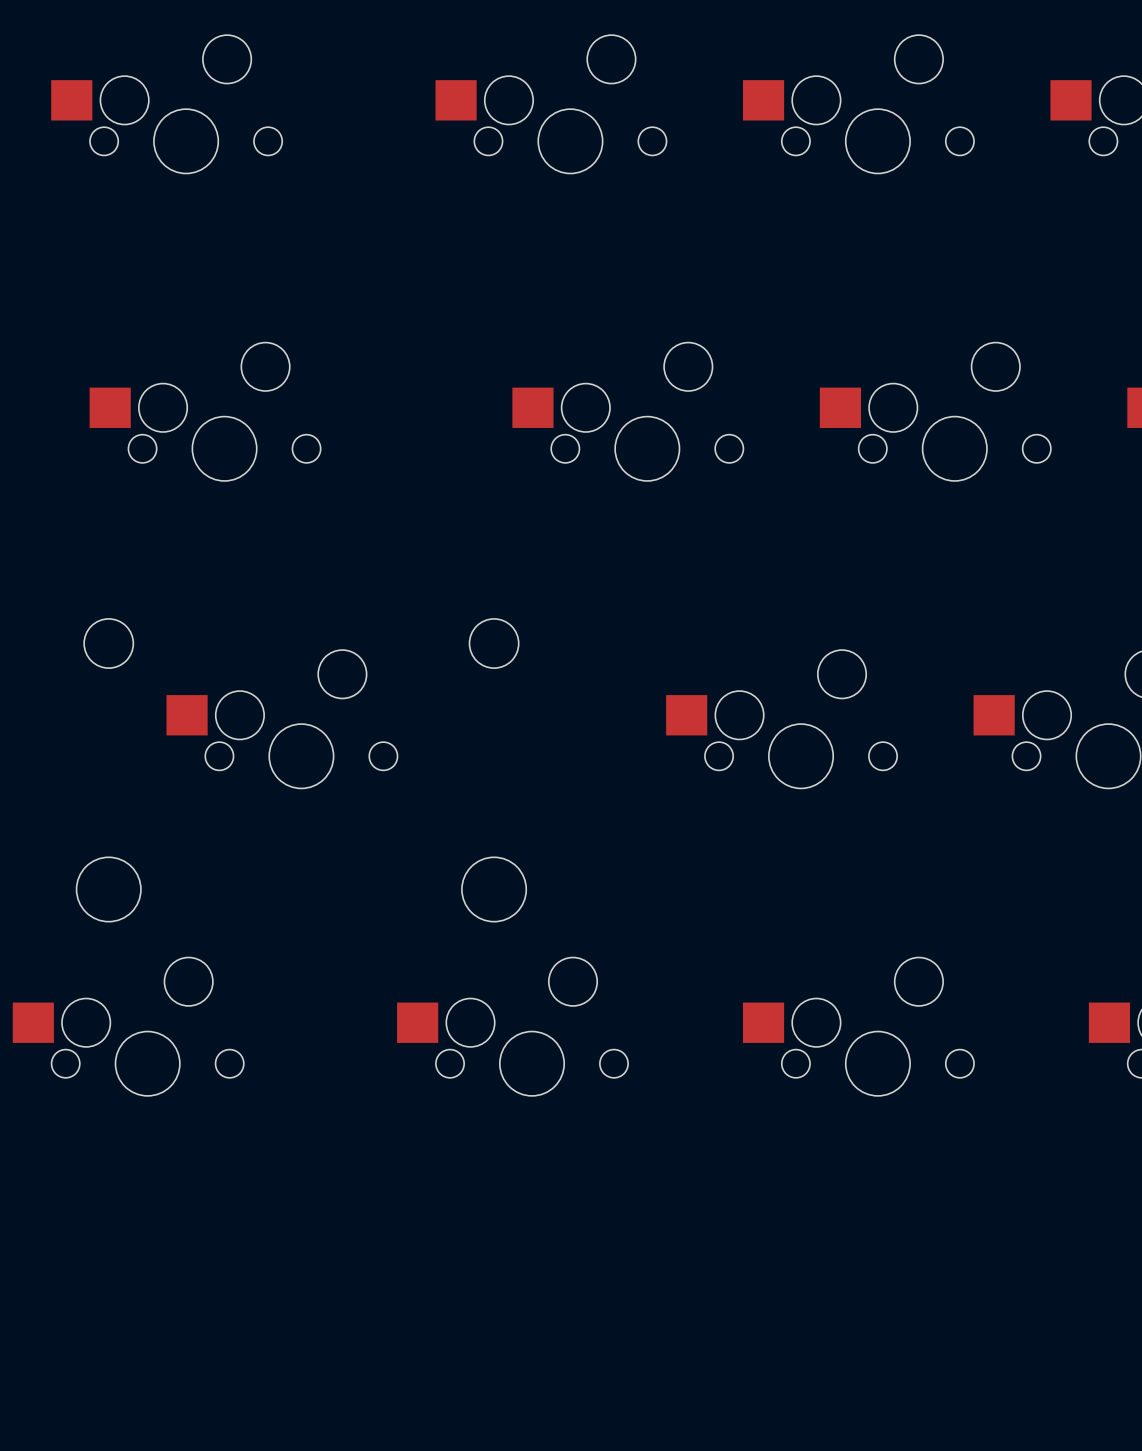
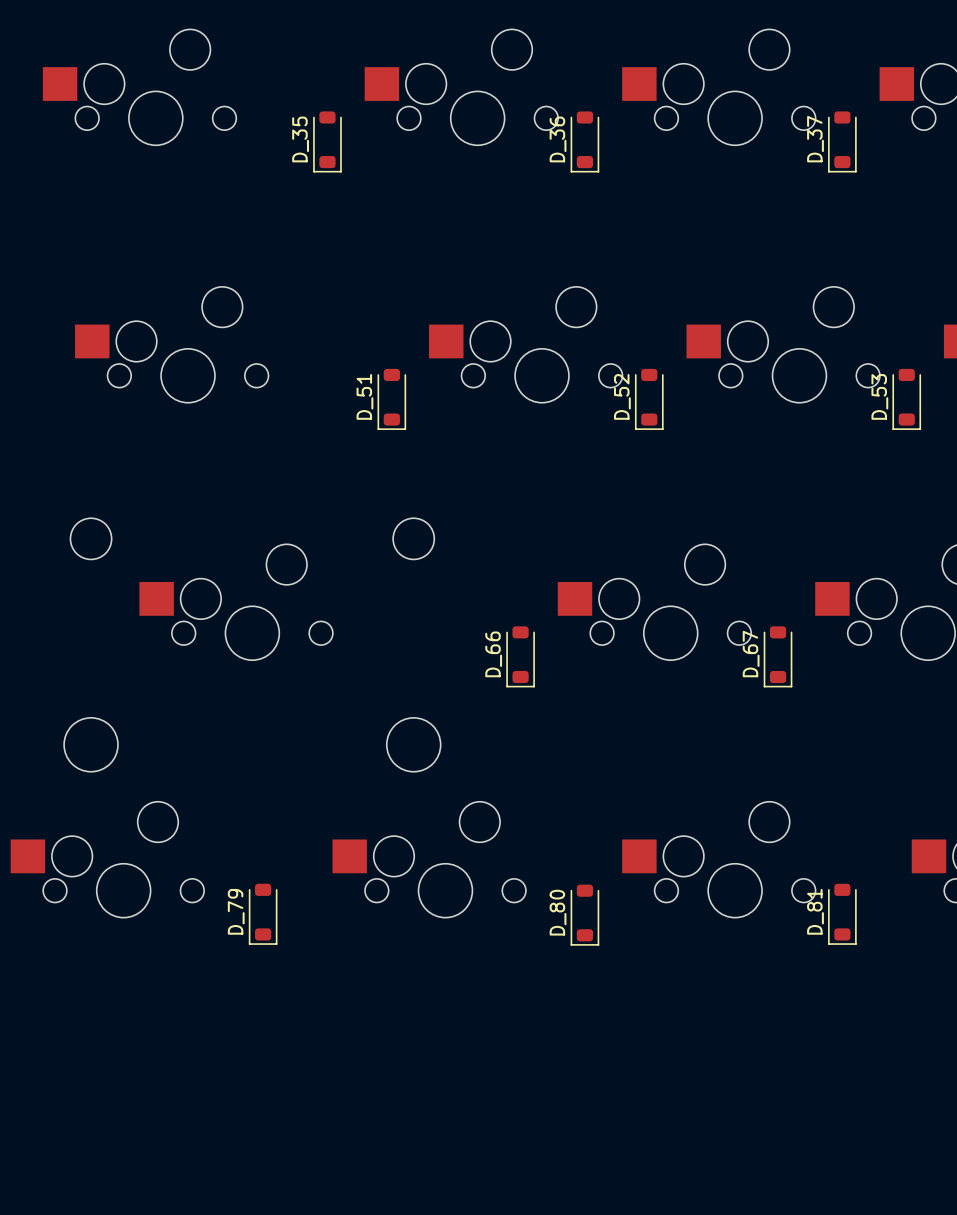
D_35: none -> (327, 141)
D_36: none -> (584, 141)
D_37: none -> (842, 141)
D_51: none -> (391, 399)
D_52: none -> (649, 399)
D_53: none -> (906, 399)
D_66: none -> (520, 656)
D_67: none -> (778, 656)
D_79: none -> (263, 914)
D_81: none -> (842, 914)
D_80: none -> (584, 915)

